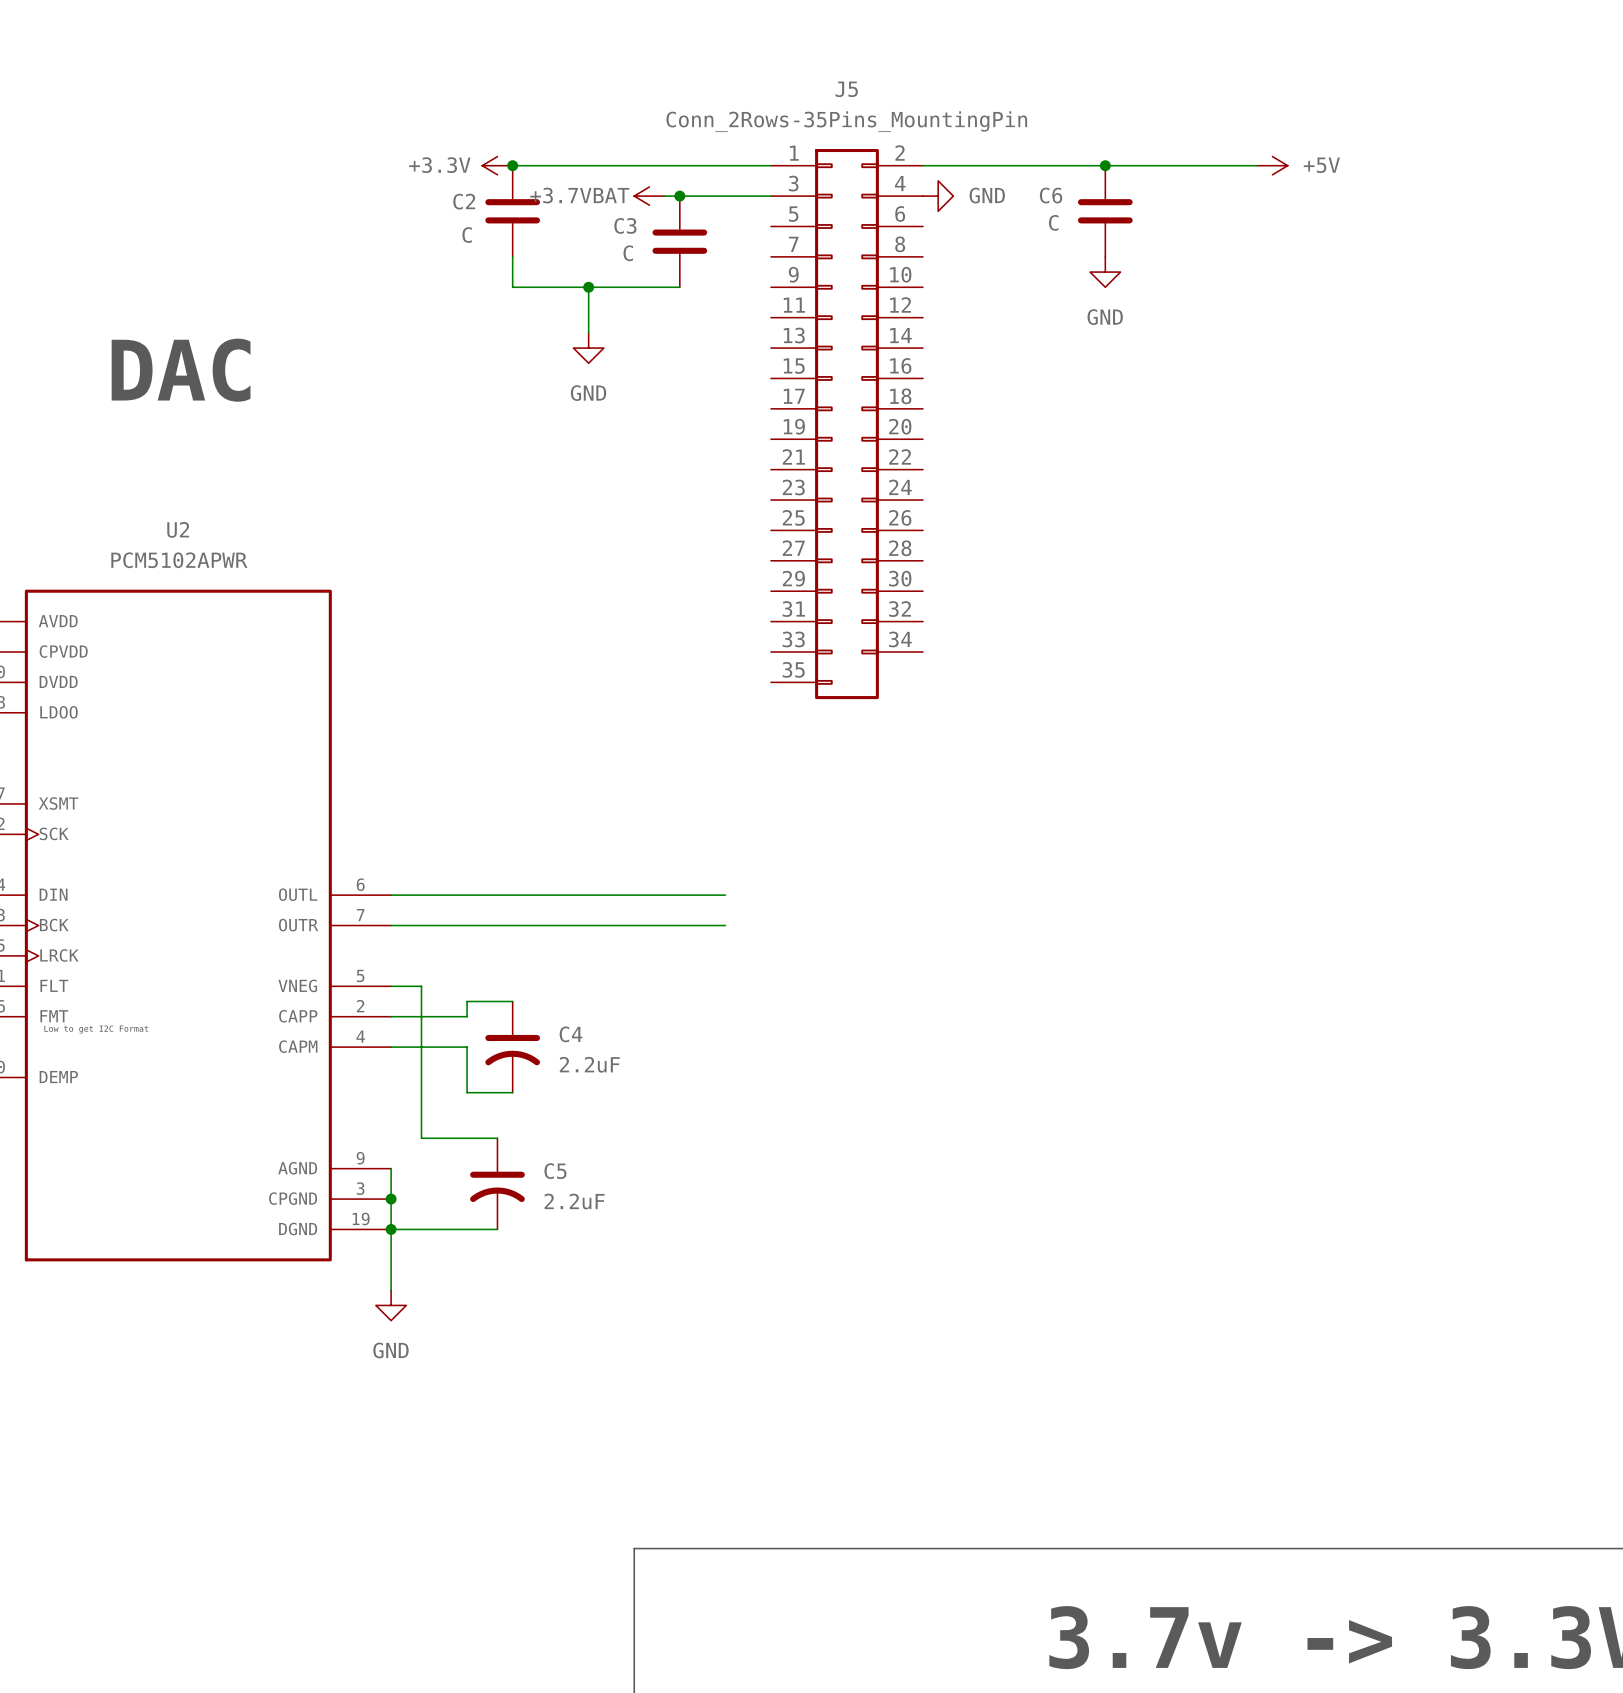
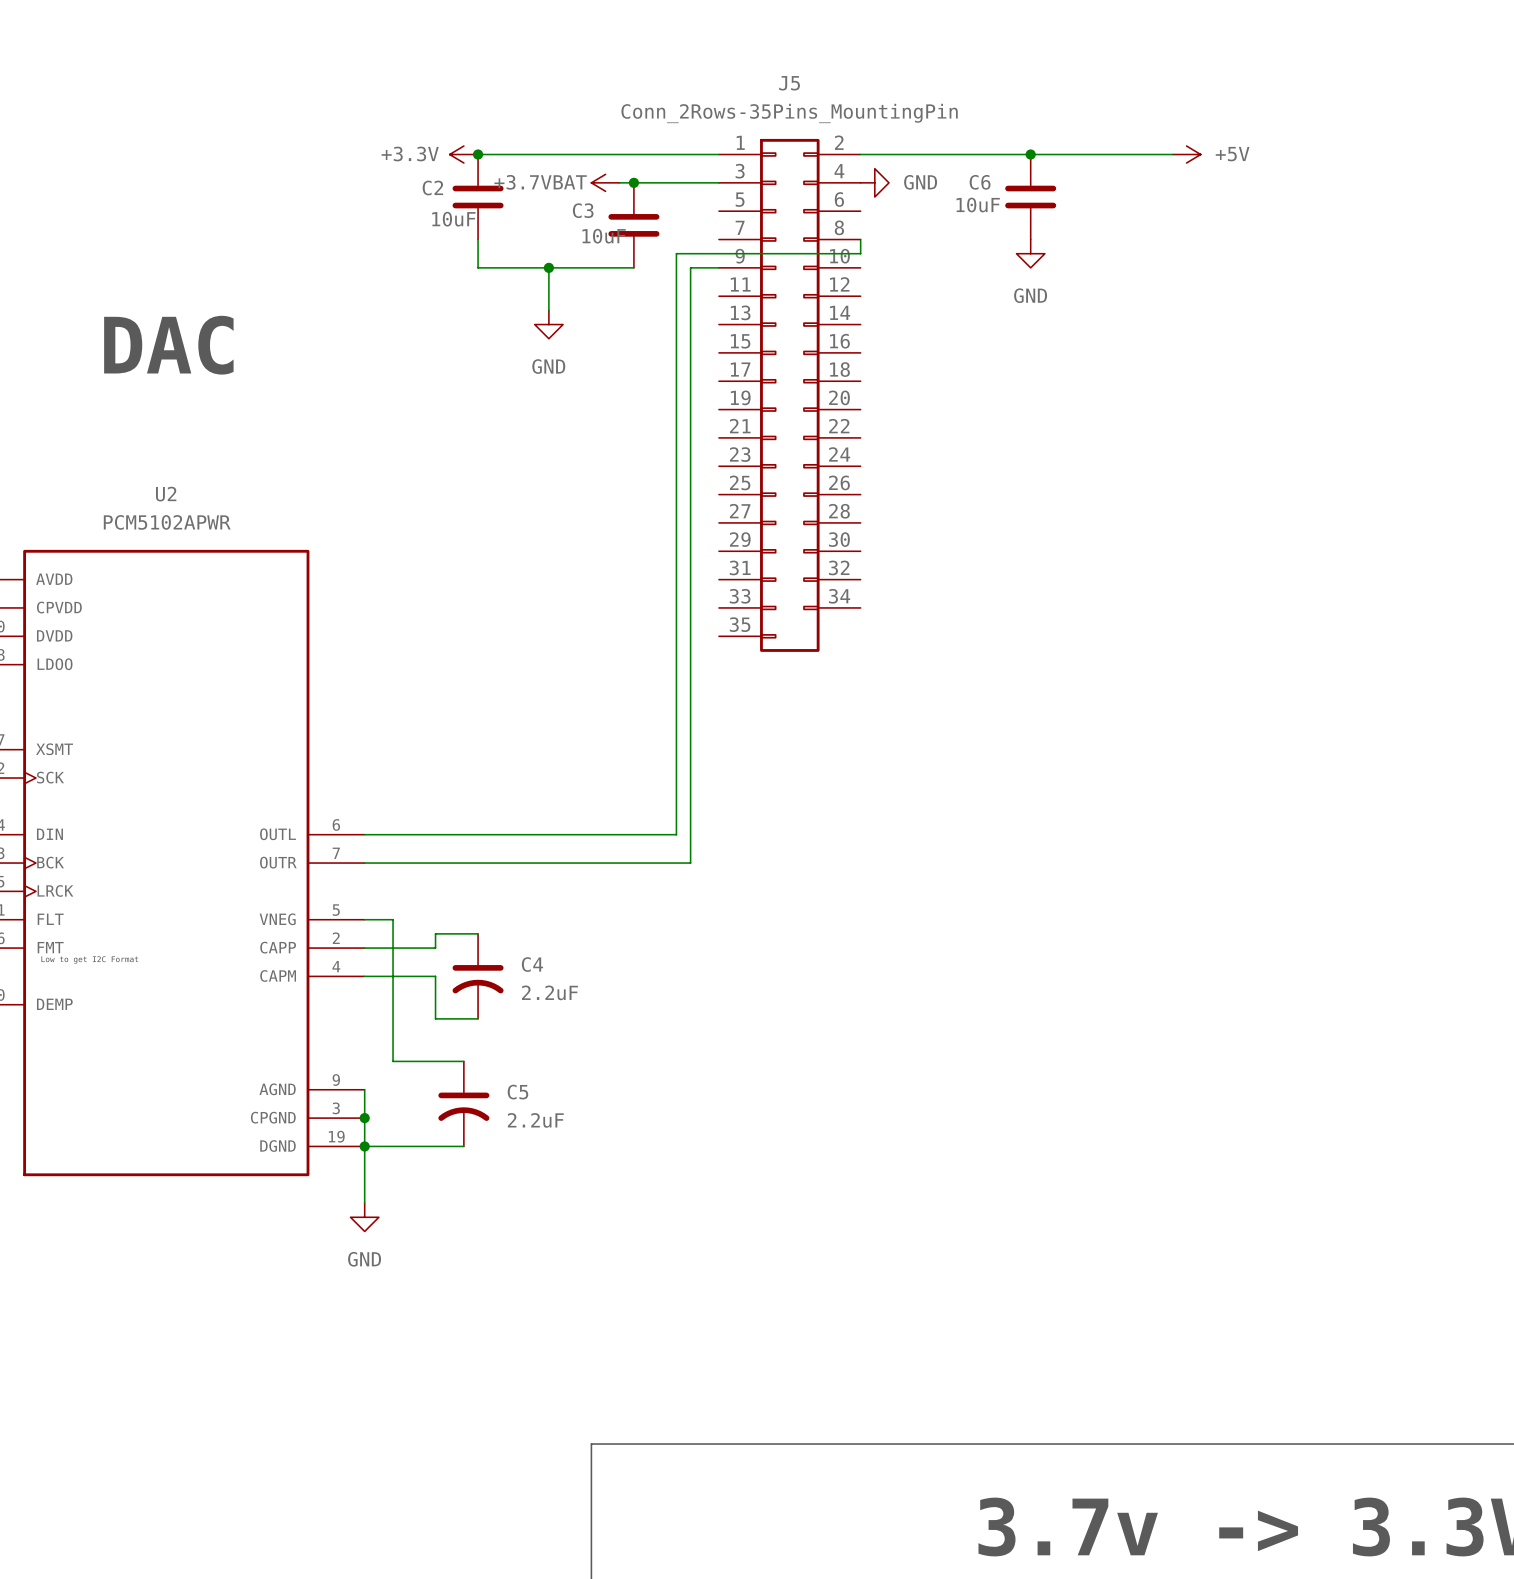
C6 value: C (1053, 222) -> 10uF (978, 205)
C2 value: C (467, 235) -> 10uF (453, 219)
C3 value: C (628, 253) -> 10uF (604, 236)
wire: none -> (860, 239) (860, 253) (676, 253) (676, 834)
wire: none -> (718, 267) (690, 267) (690, 863) (676, 863)

